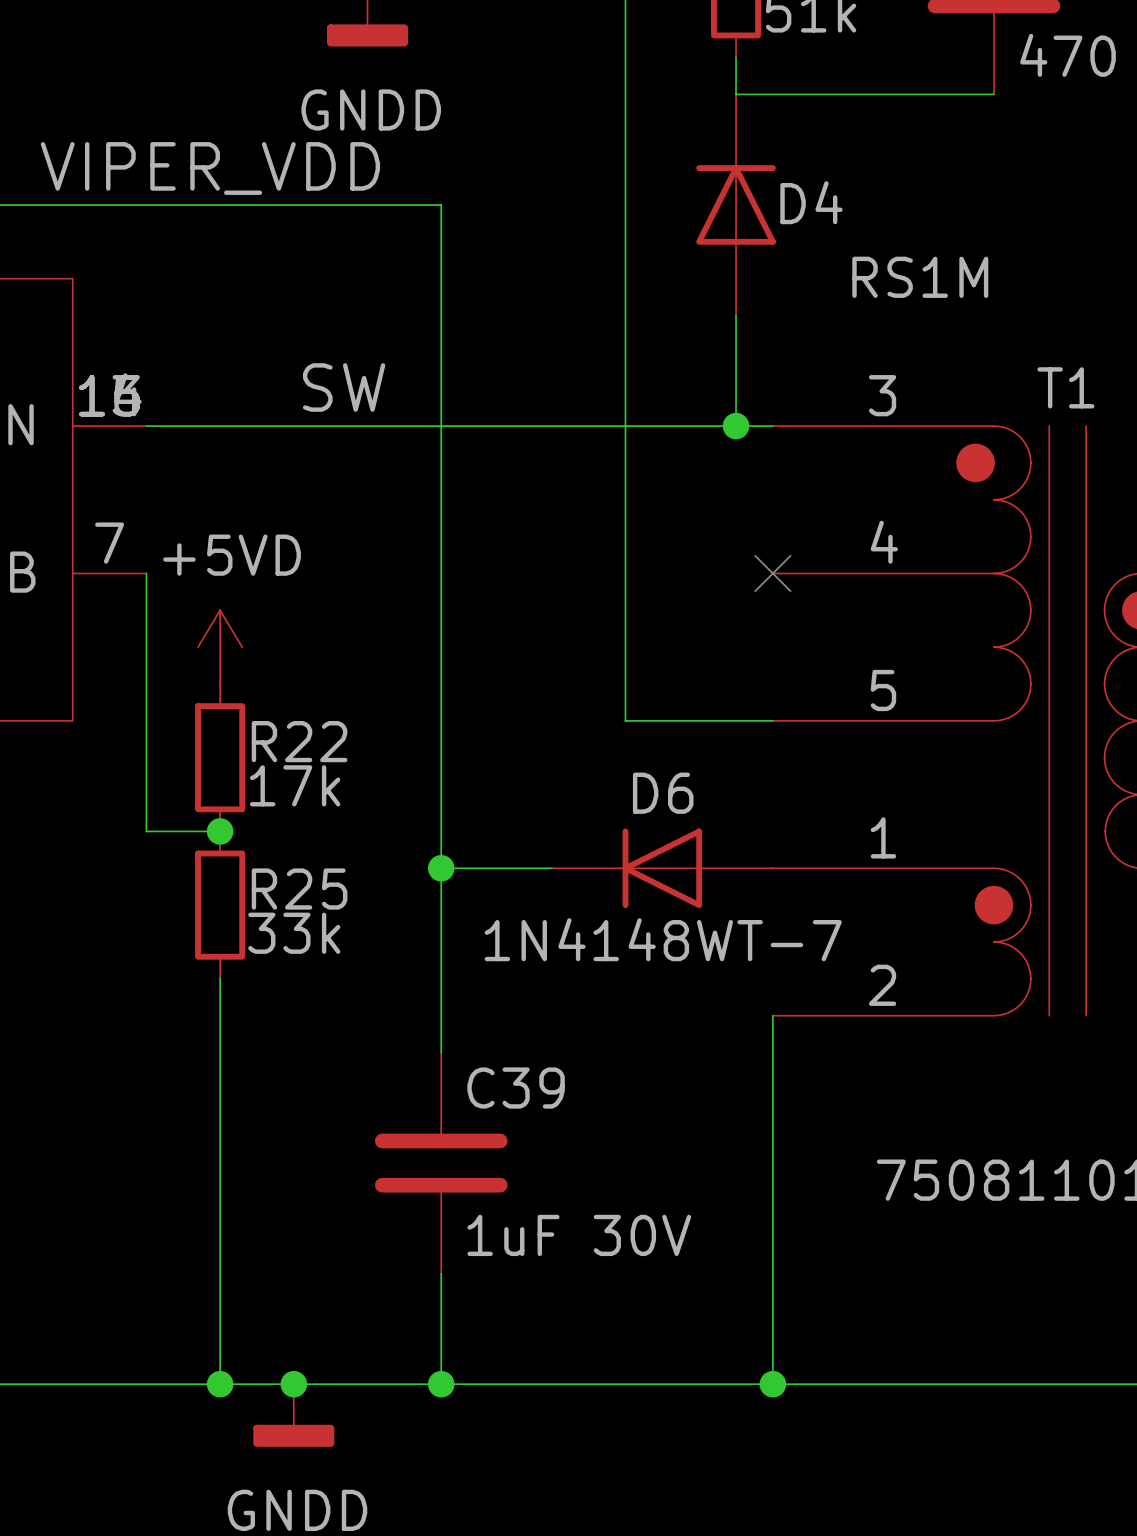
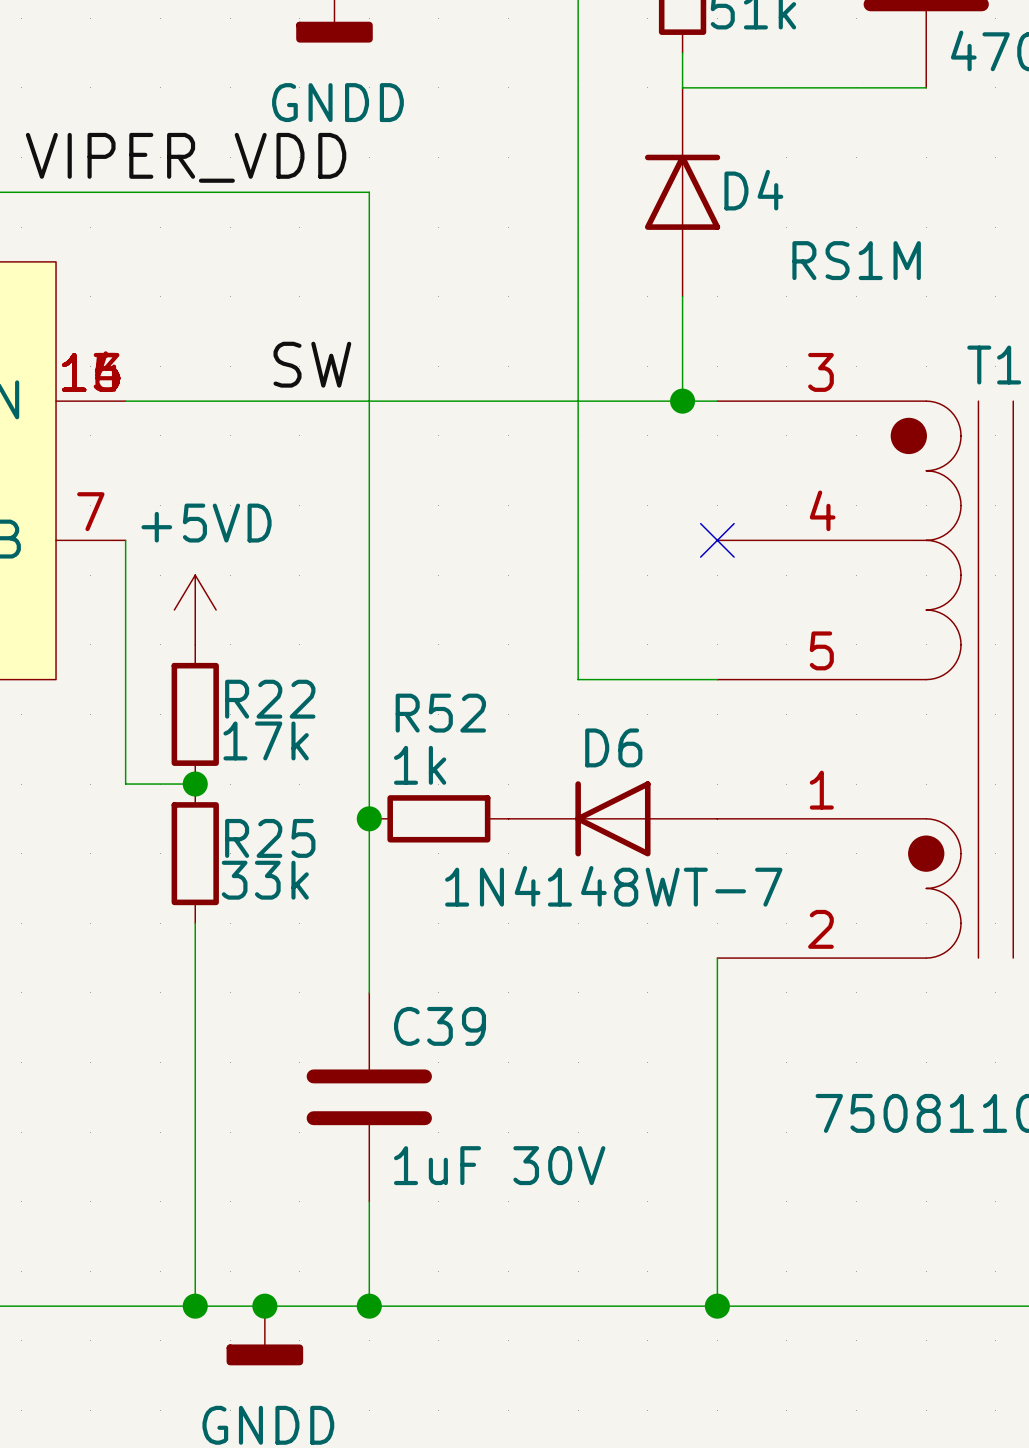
wire: (404, 204) (441, 204) (441, 1052) -> (369, 192) (369, 992)
wire: (441, 868) (551, 868) -> none
junction position: (441, 868) -> (369, 818)
R52: none -> 1k (438, 818)
C39 position: (441, 1163) -> (369, 1097)
wire: (441, 1273) (441, 1384) -> (369, 1201) (369, 1306)
junction position: (441, 1384) -> (369, 1306)

